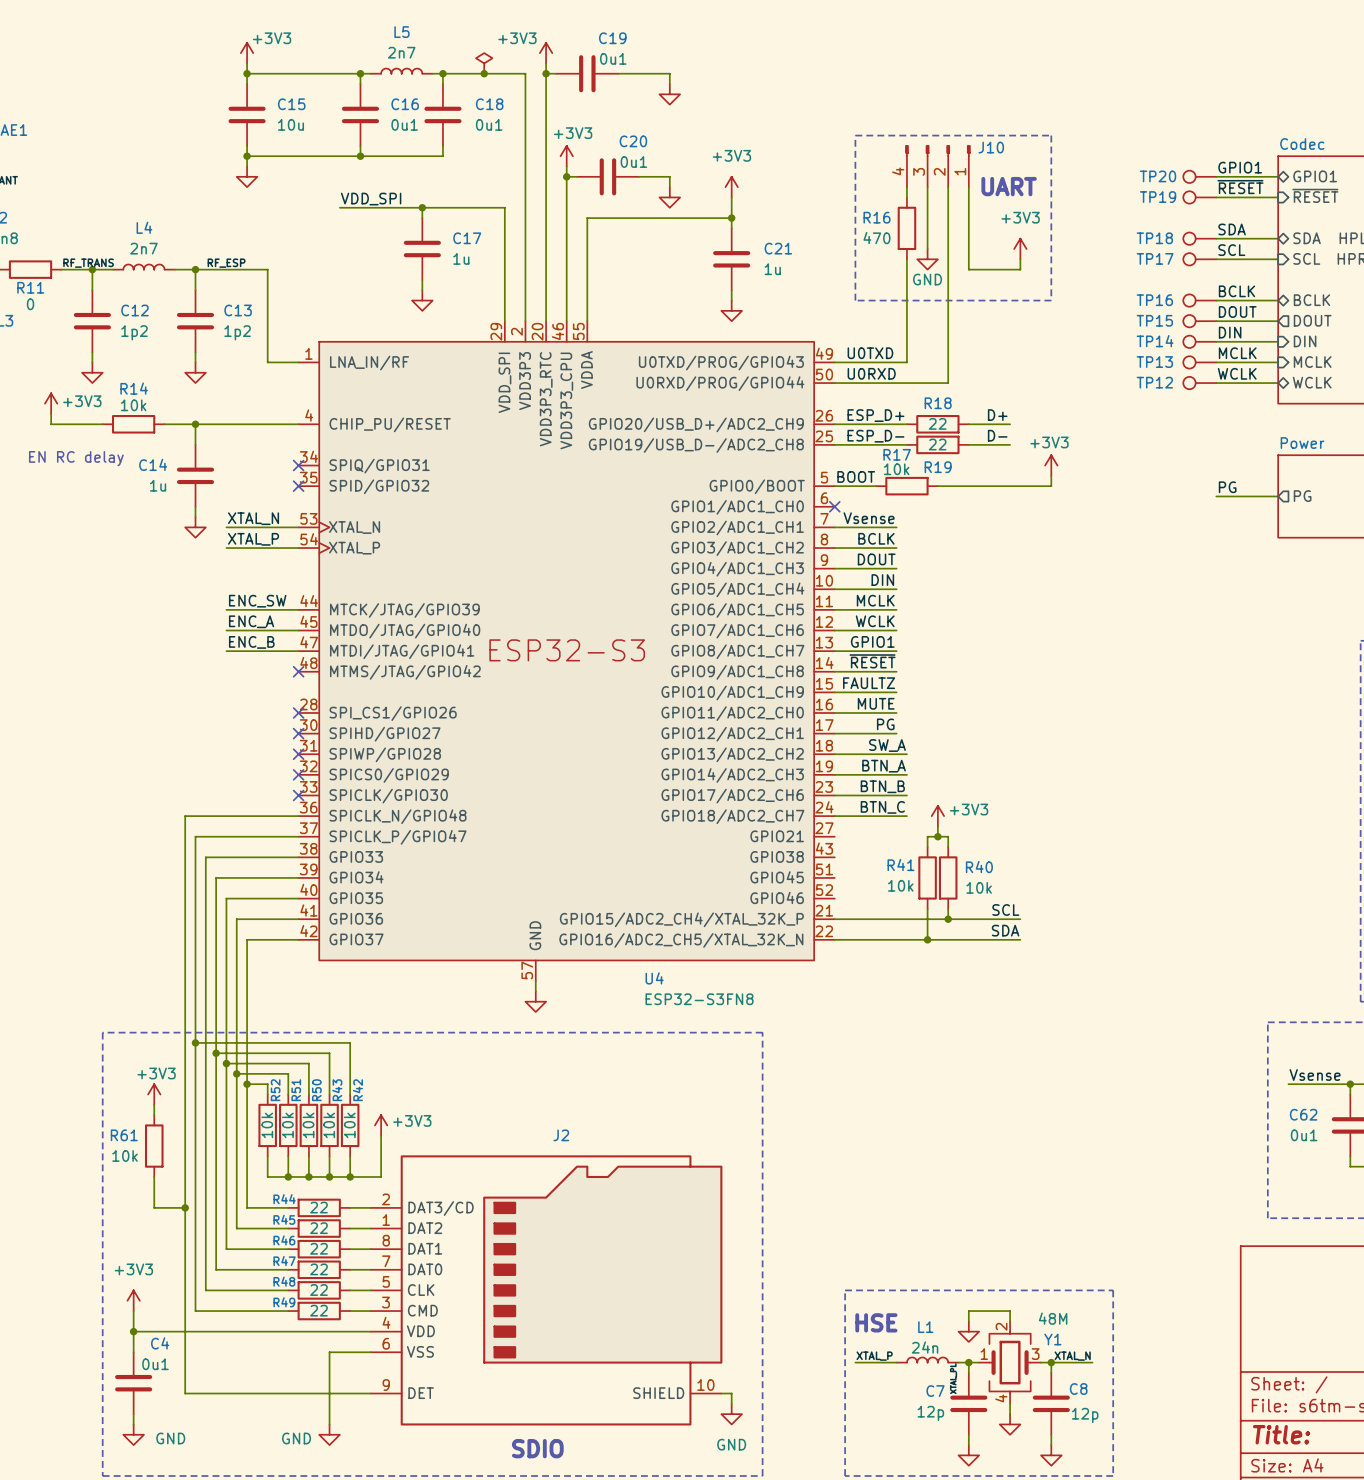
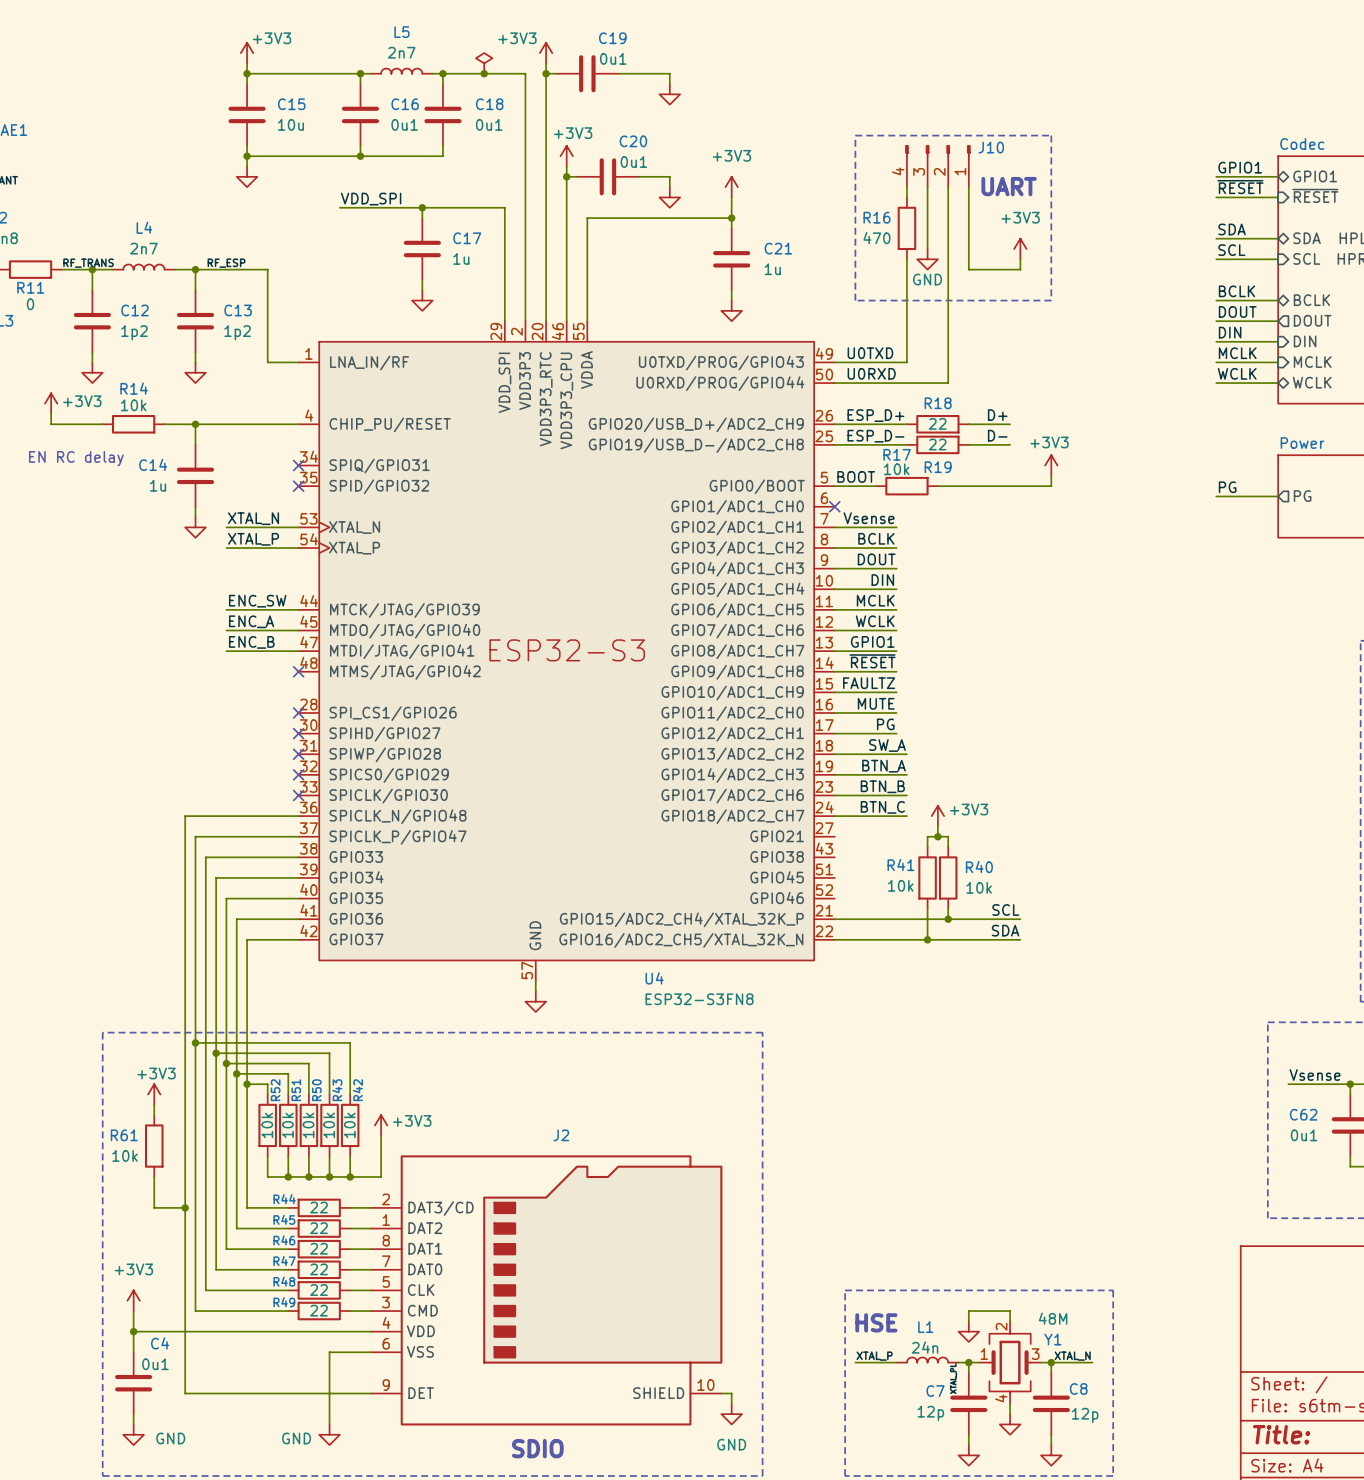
TP20: (1199, 176) -> none
TP19: (1199, 197) -> none
TP18: (1199, 238) -> none
TP17: (1199, 259) -> none
TP16: (1199, 300) -> none
TP15: (1199, 321) -> none
TP14: (1199, 341) -> none
TP13: (1199, 362) -> none
TP12: (1199, 383) -> none

